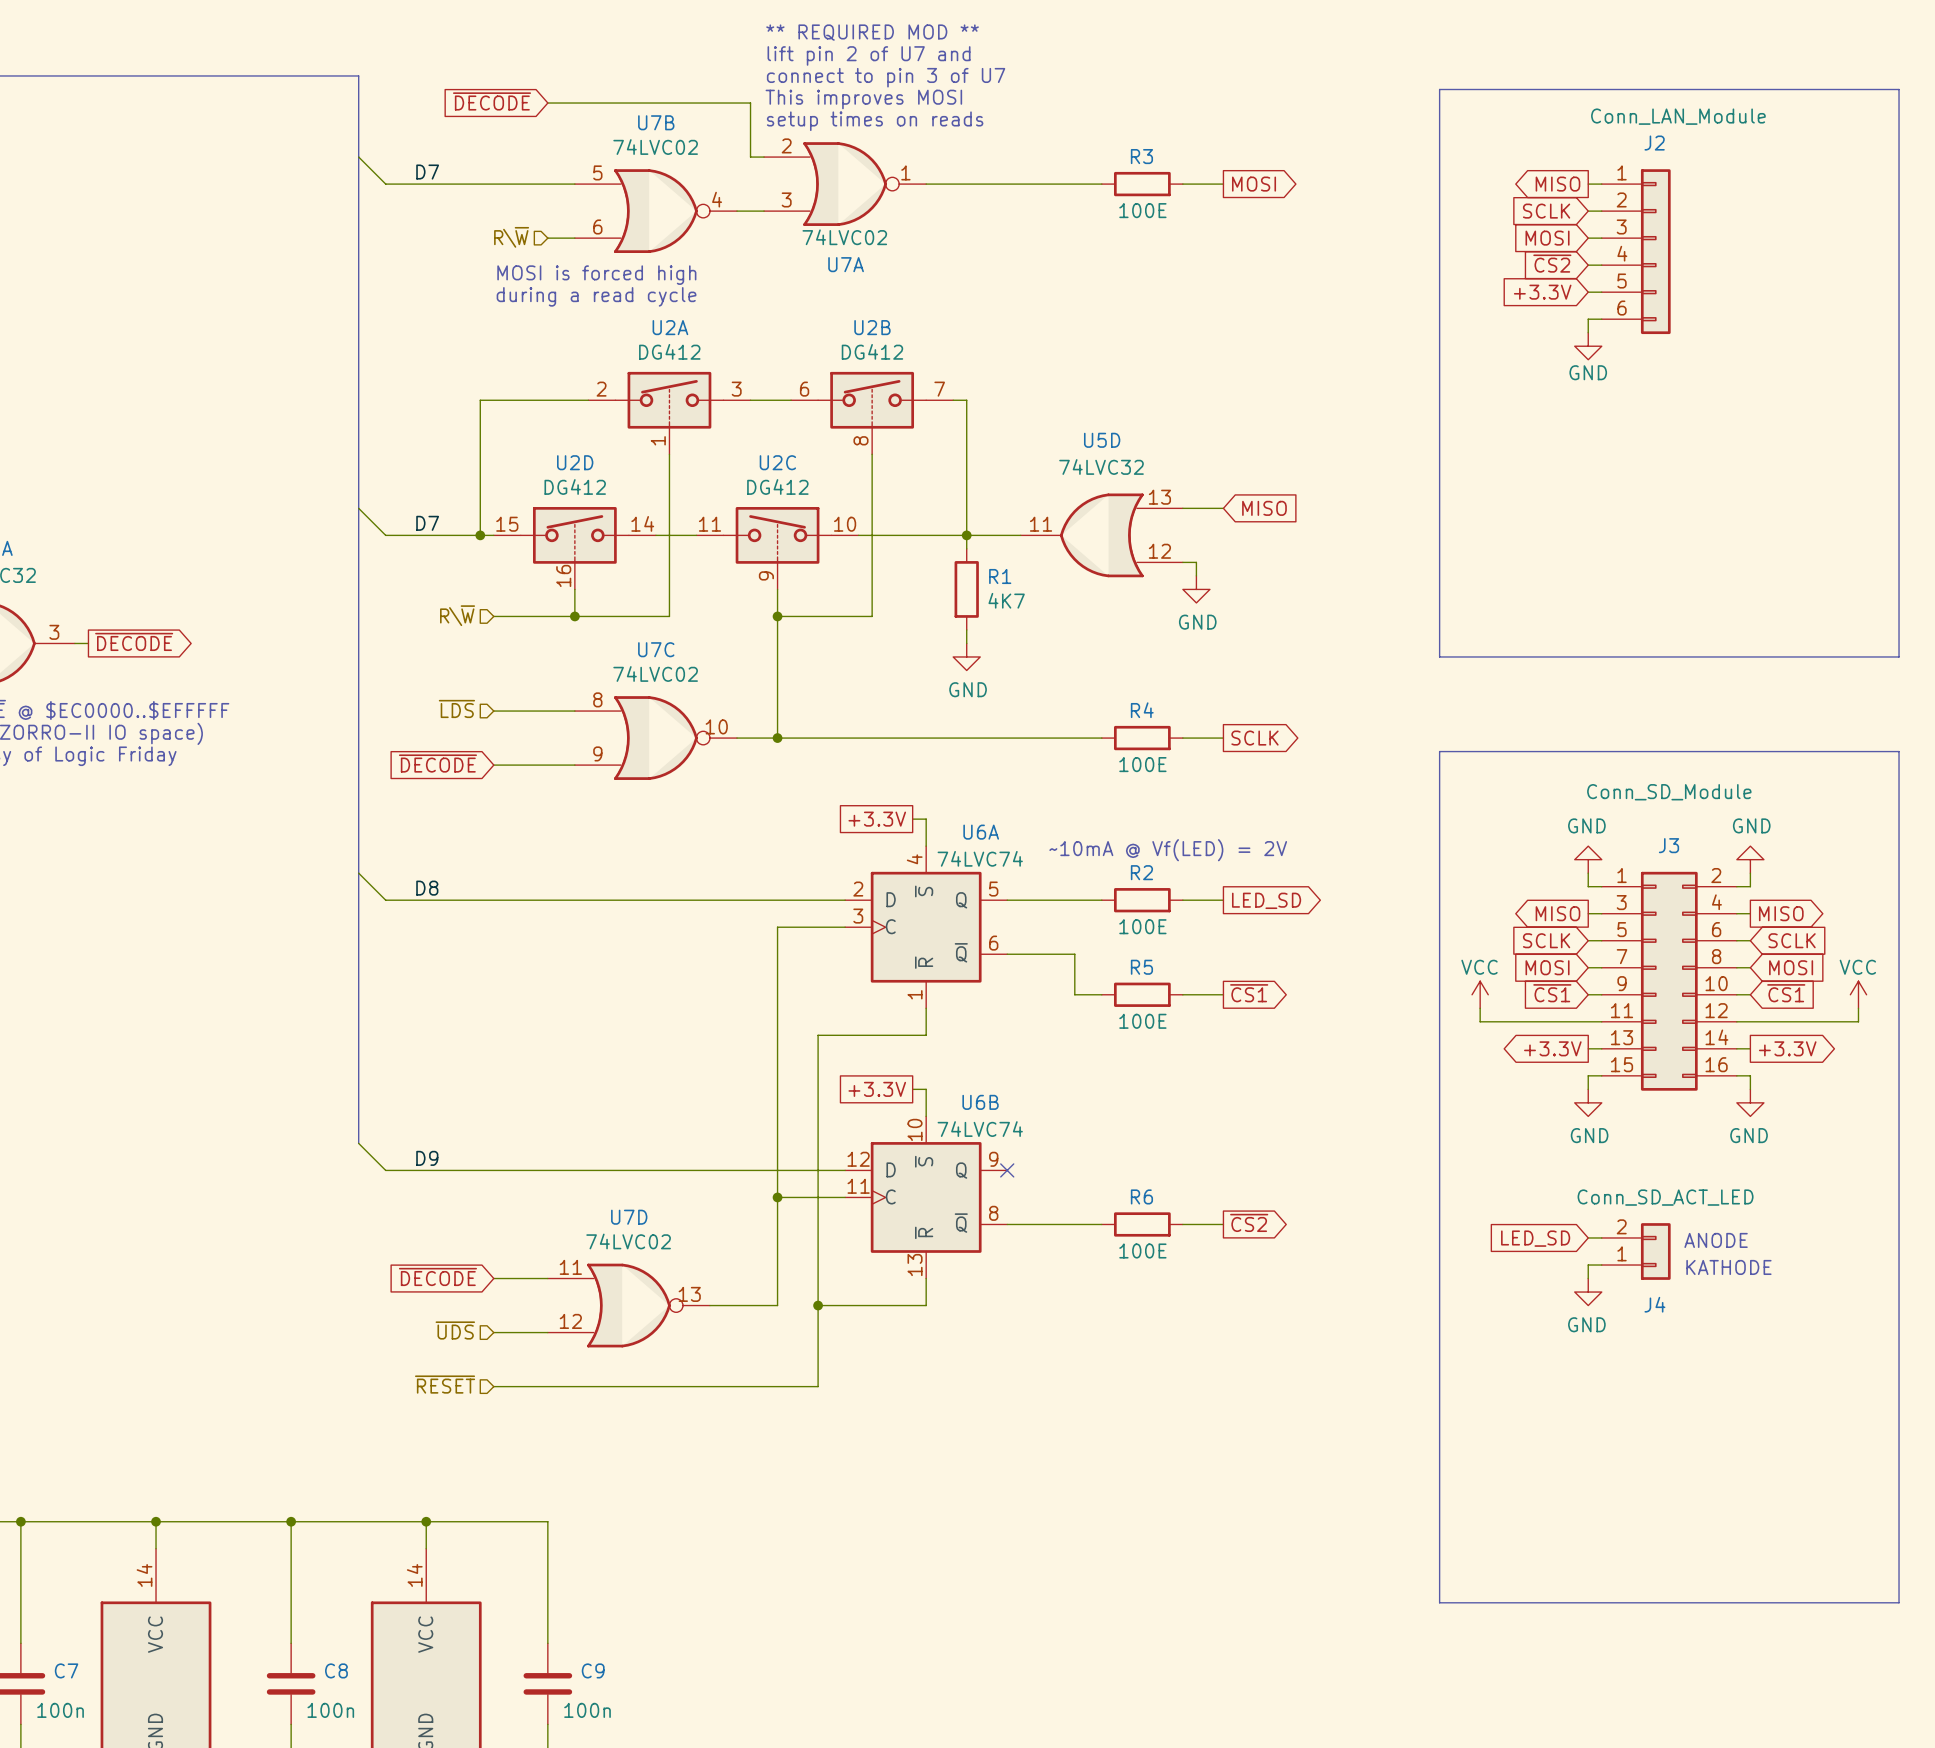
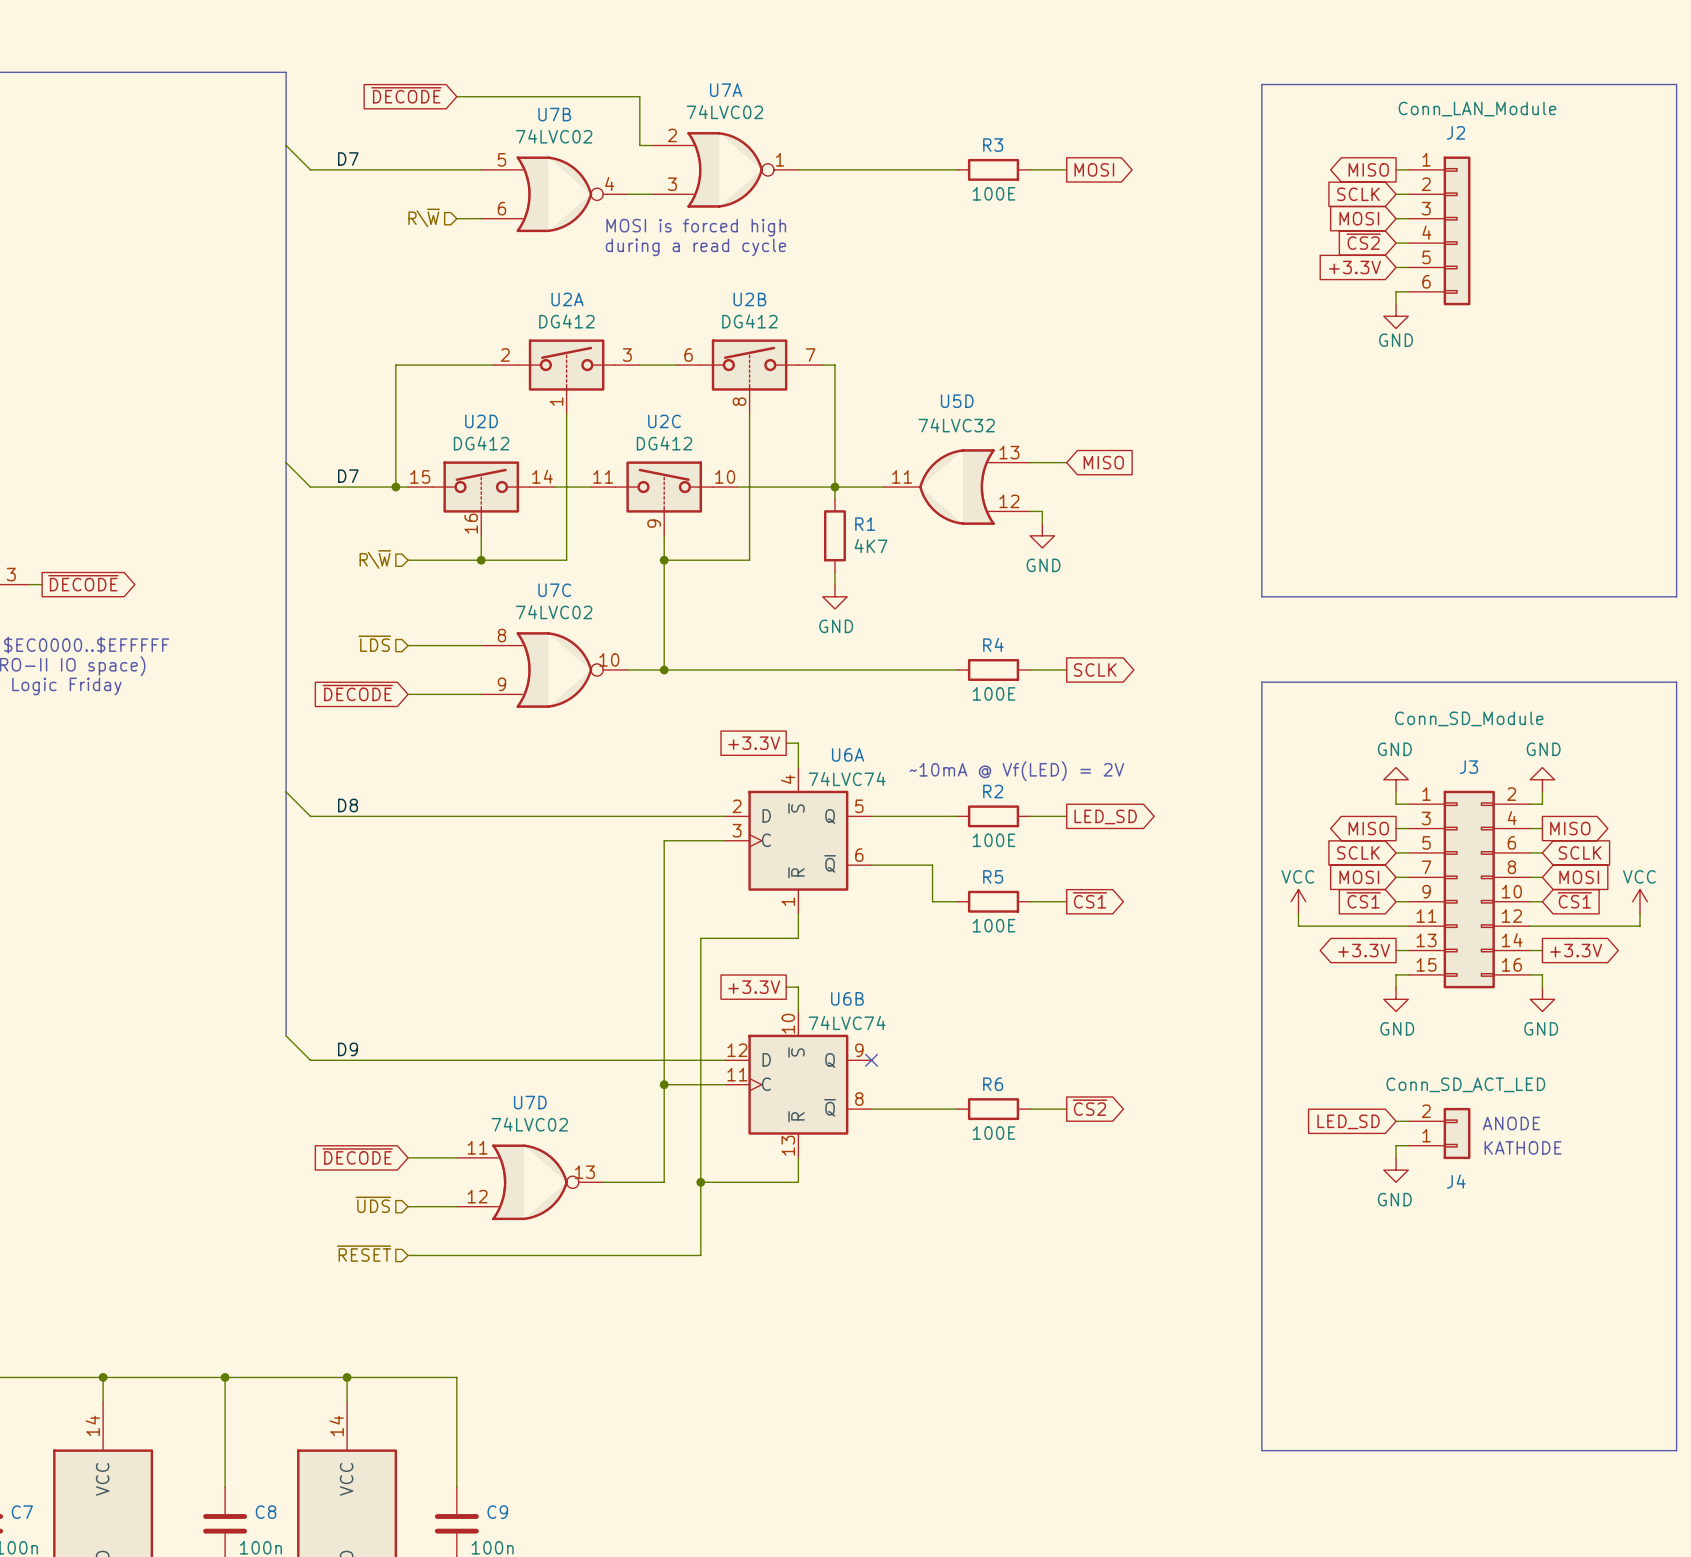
text: ** REQUIRED MOD ** (872, 32) -> none
text: lift pin 2 of U7 and (869, 55) -> none
text: connect to pin 3 of U7 (886, 77) -> none
text: This improves MOSI (863, 99) -> none
text: setup times on reads (875, 121) -> none
U7A value position: 74LVC02 (844, 237) -> 74LVC02 (724, 112)
U7A name position: U7A (846, 264) -> U7A (726, 90)
text position: MOSI is forced high (596, 275) -> MOSI is forced high (696, 227)
text position: during a read cycle (596, 296) -> during a read cycle (695, 247)

